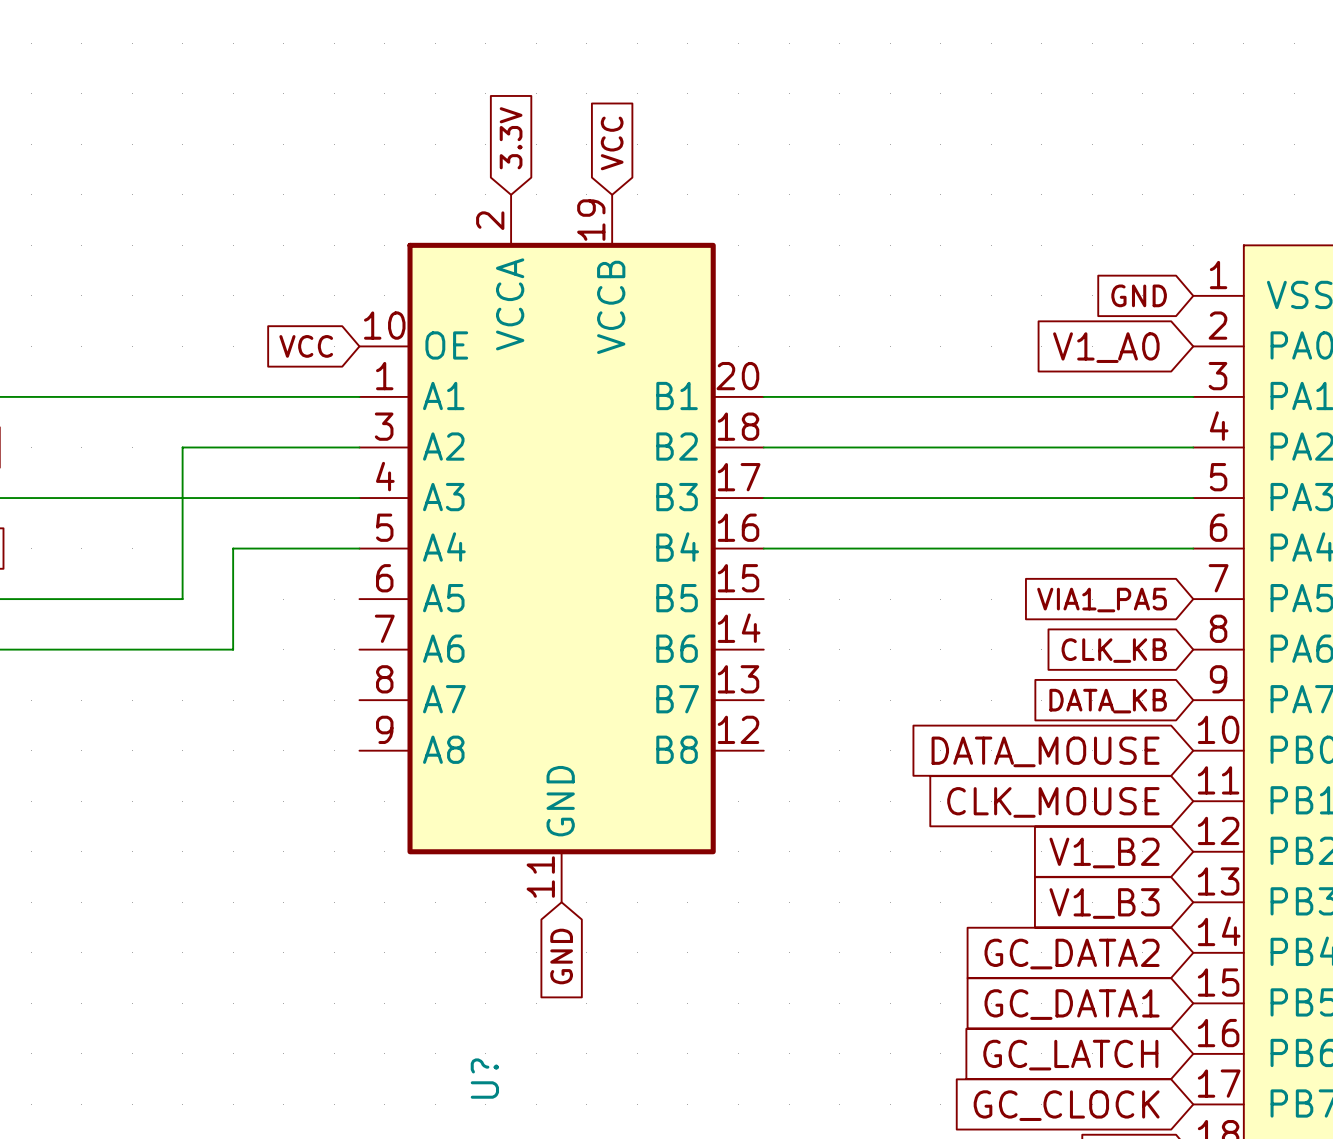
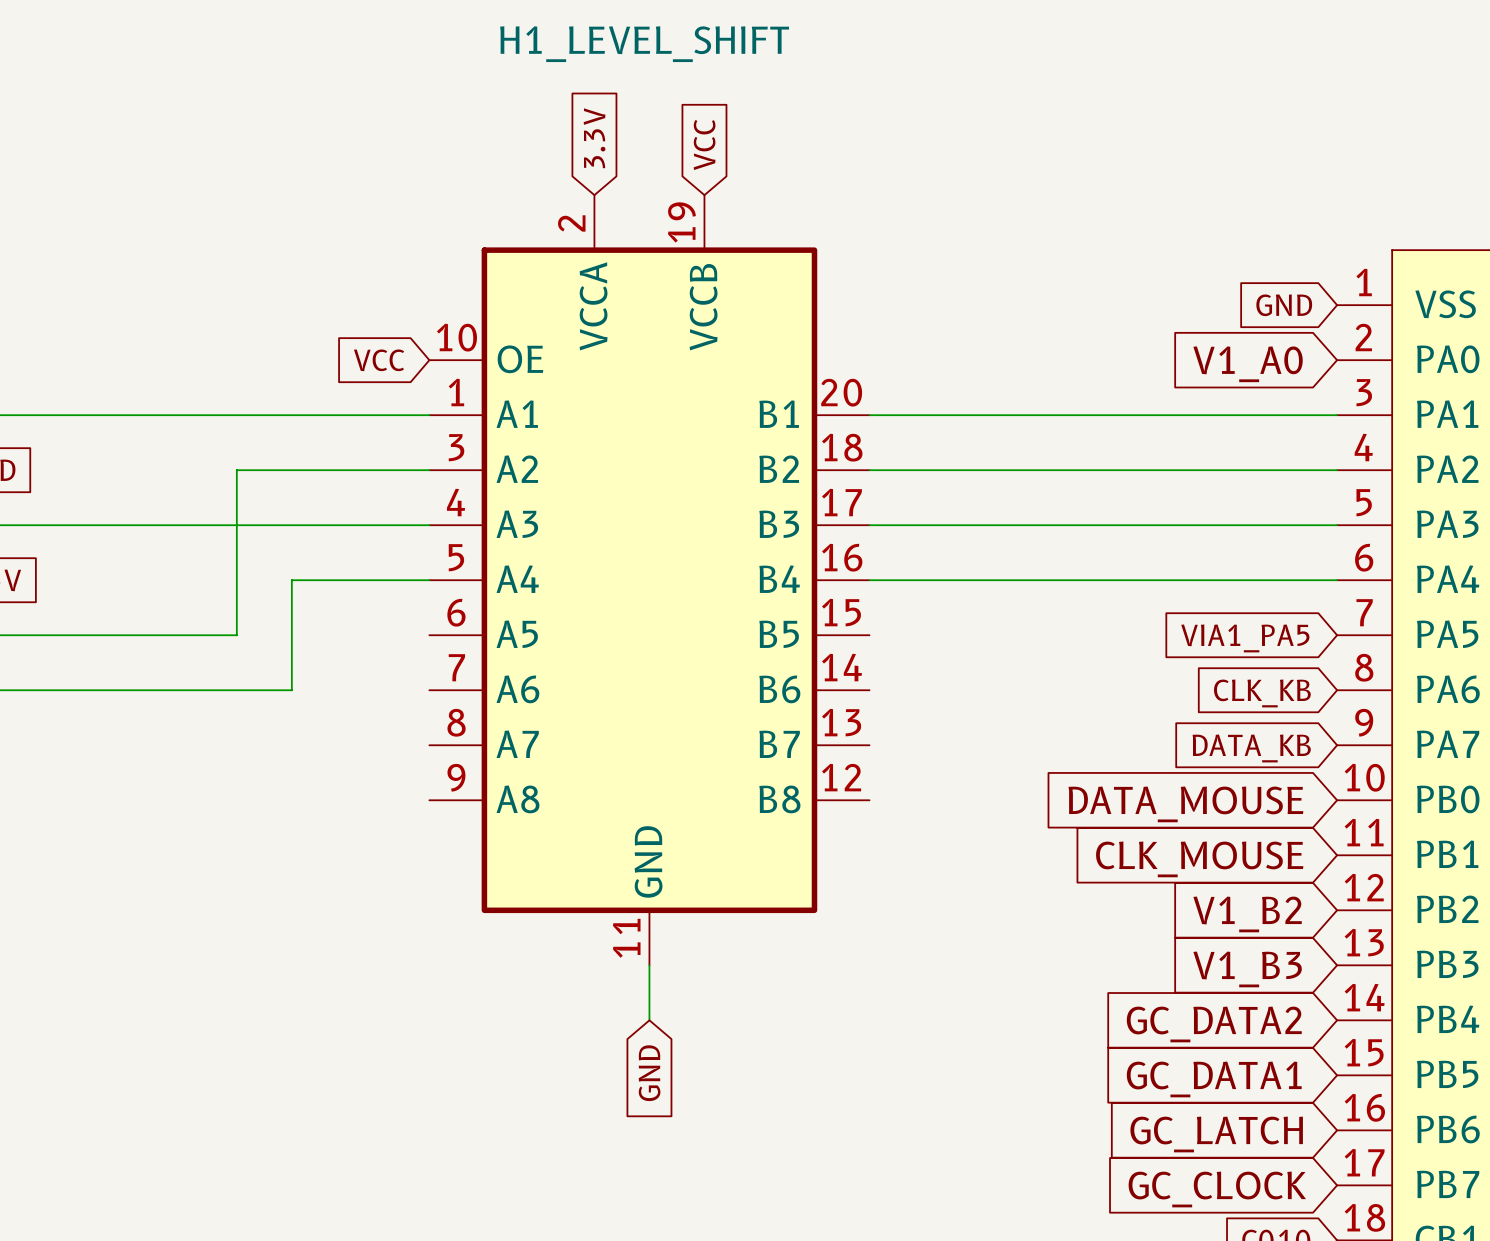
wire: none -> (649, 965) (649, 1020)
global label position: GND (561, 956) -> GND (649, 1073)
U? name: U? (484, 1078) -> H1_LEVEL_SHIFT (644, 44)

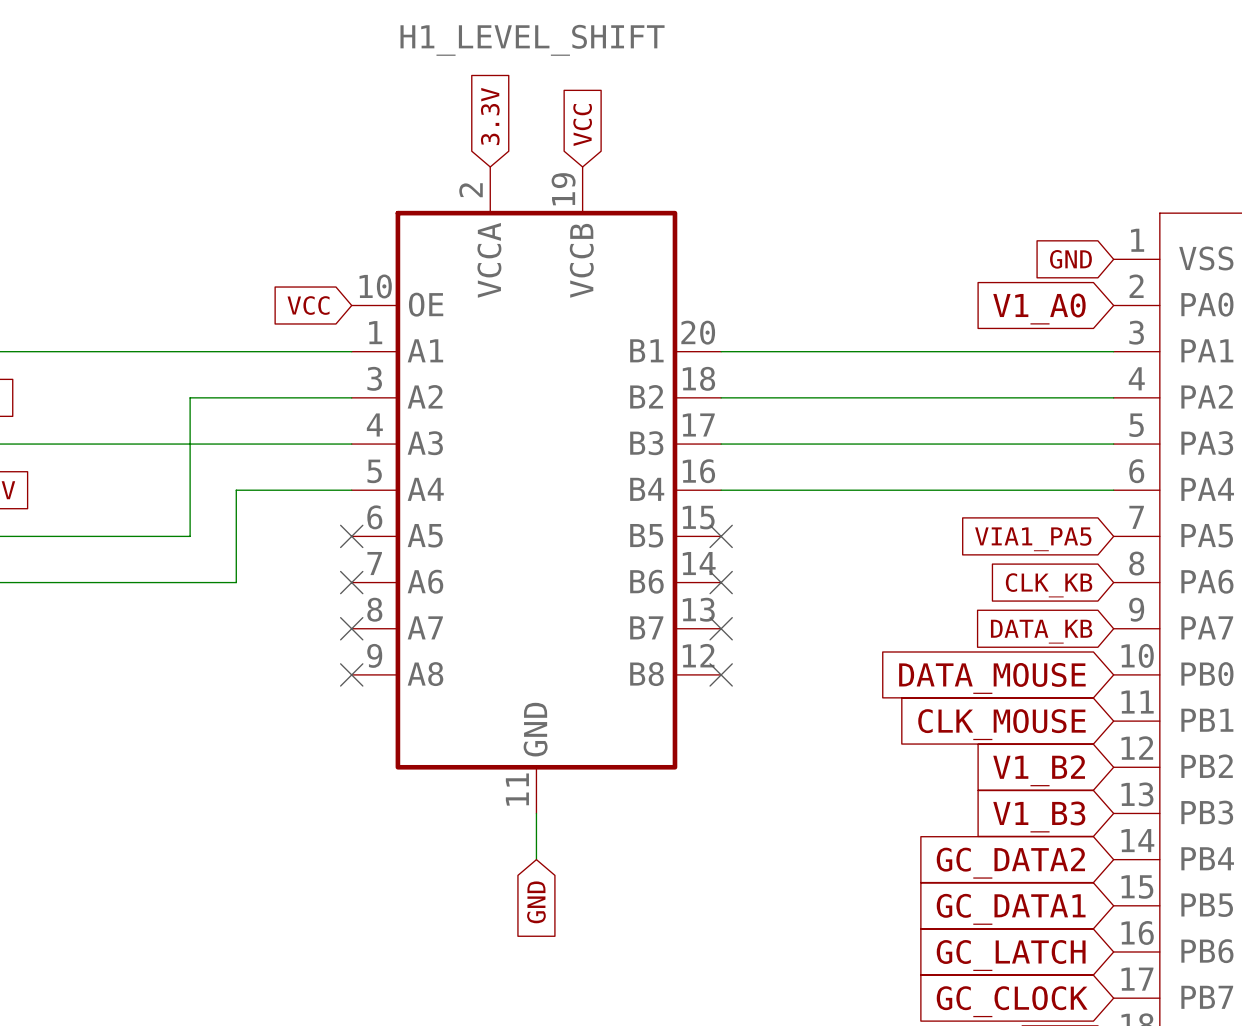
no-connect mark: none -> (351, 536)
no-connect mark: none -> (721, 536)
no-connect mark: none -> (351, 582)
no-connect mark: none -> (721, 582)
no-connect mark: none -> (351, 628)
no-connect mark: none -> (721, 628)
no-connect mark: none -> (351, 674)
no-connect mark: none -> (721, 674)

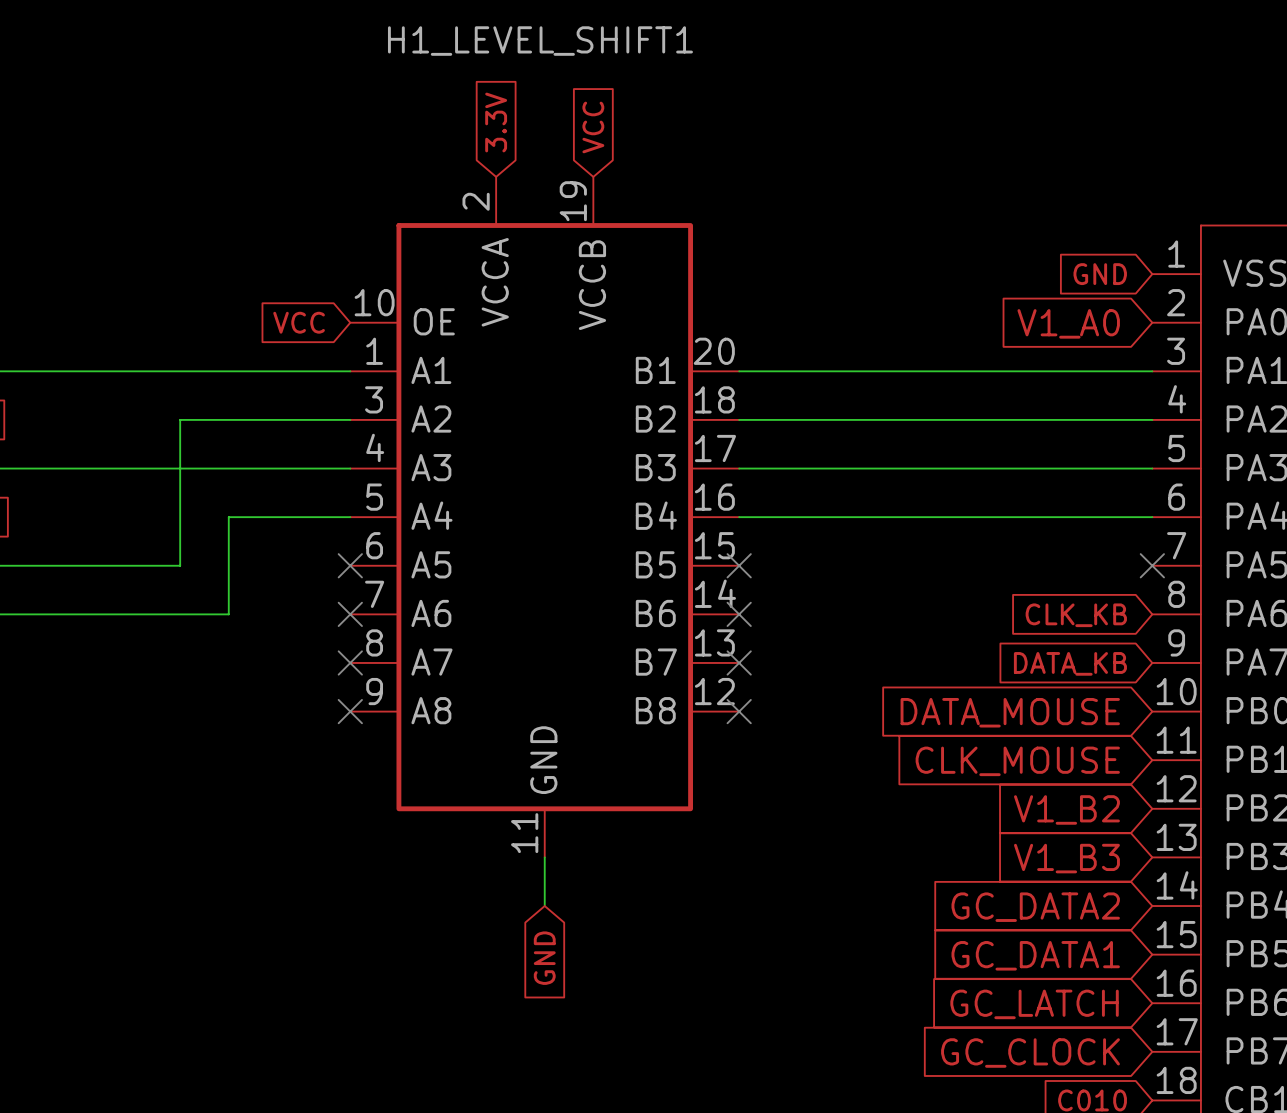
H1_LEVEL_SHIFT name: H1_LEVEL_SHIFT (532, 40) -> H1_LEVEL_SHIFT1 (540, 41)
no-connect mark: none -> (1152, 565)
global label: VIA1_PA5 (1033, 539) -> none

